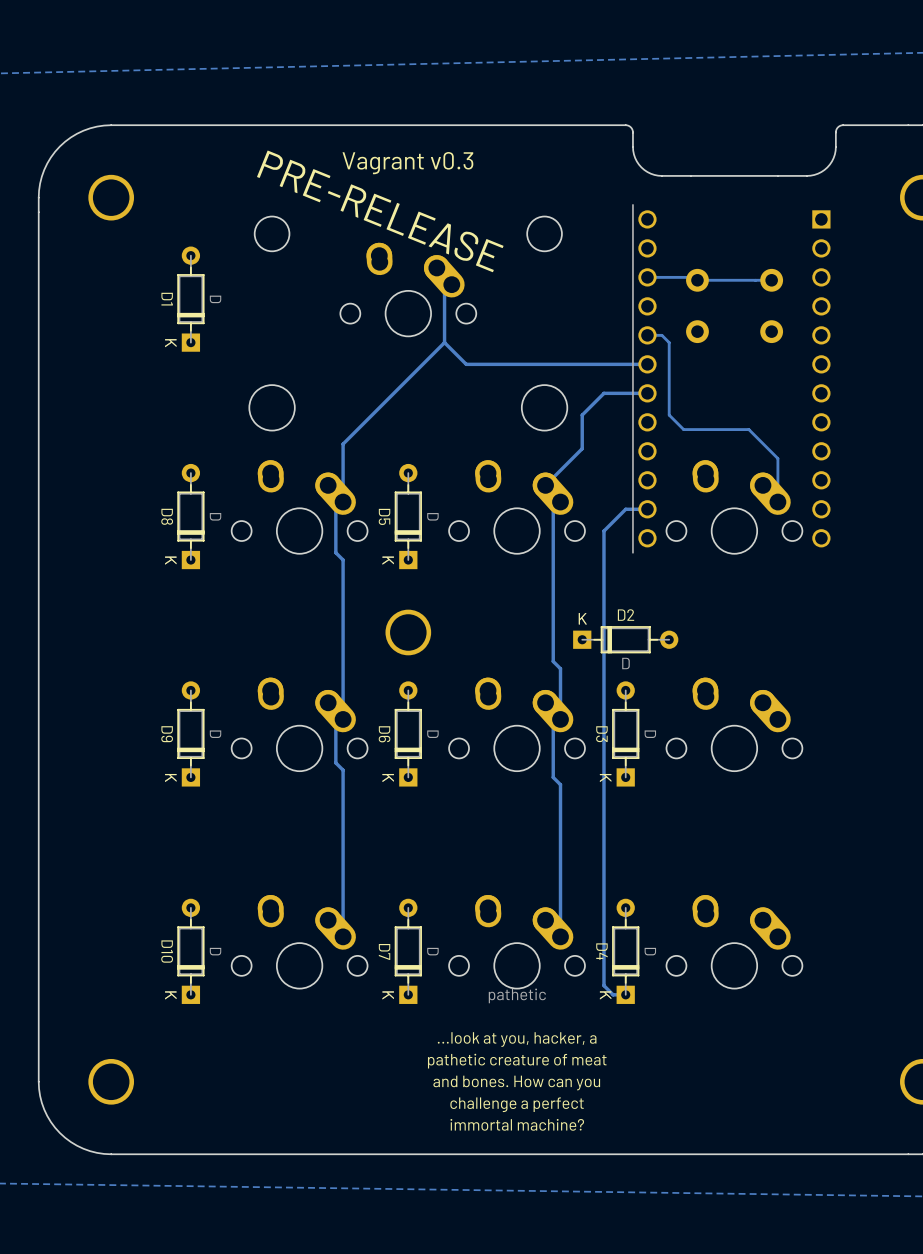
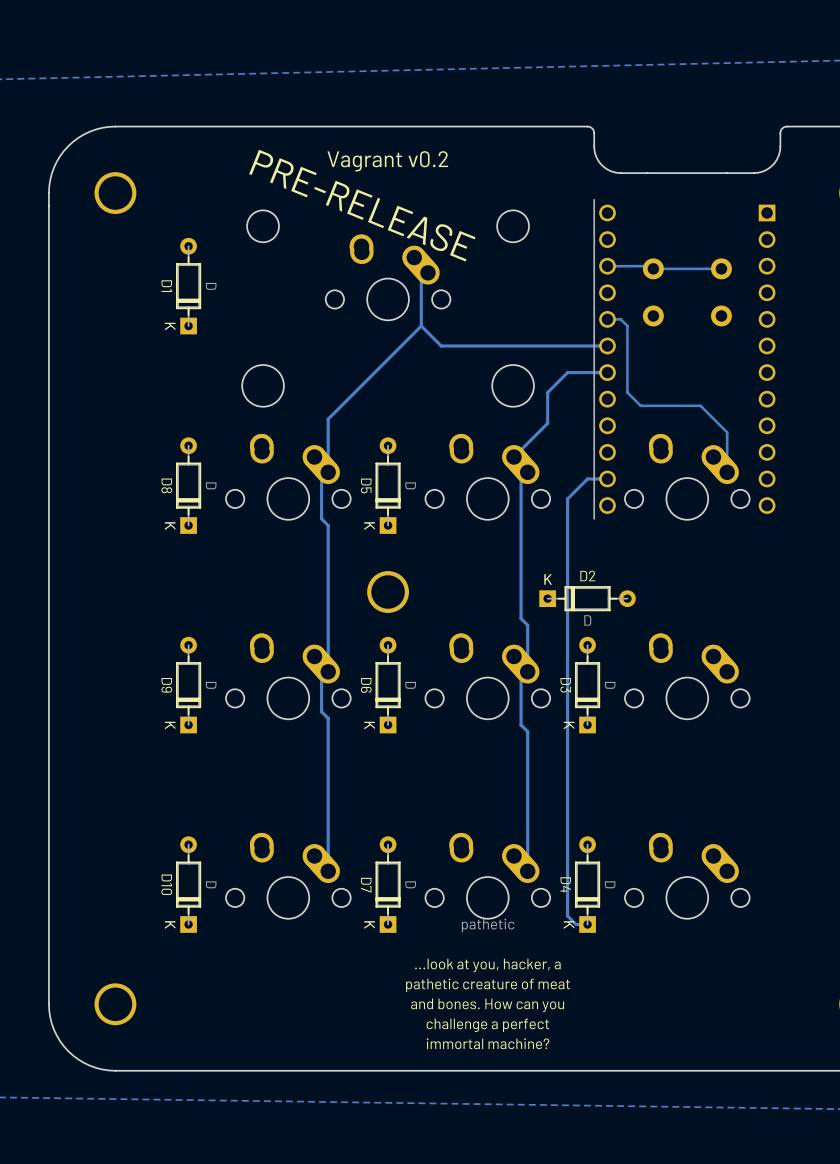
text: Vagrant v0.3 (407, 163) -> Vagrant v0.2 (387, 161)

